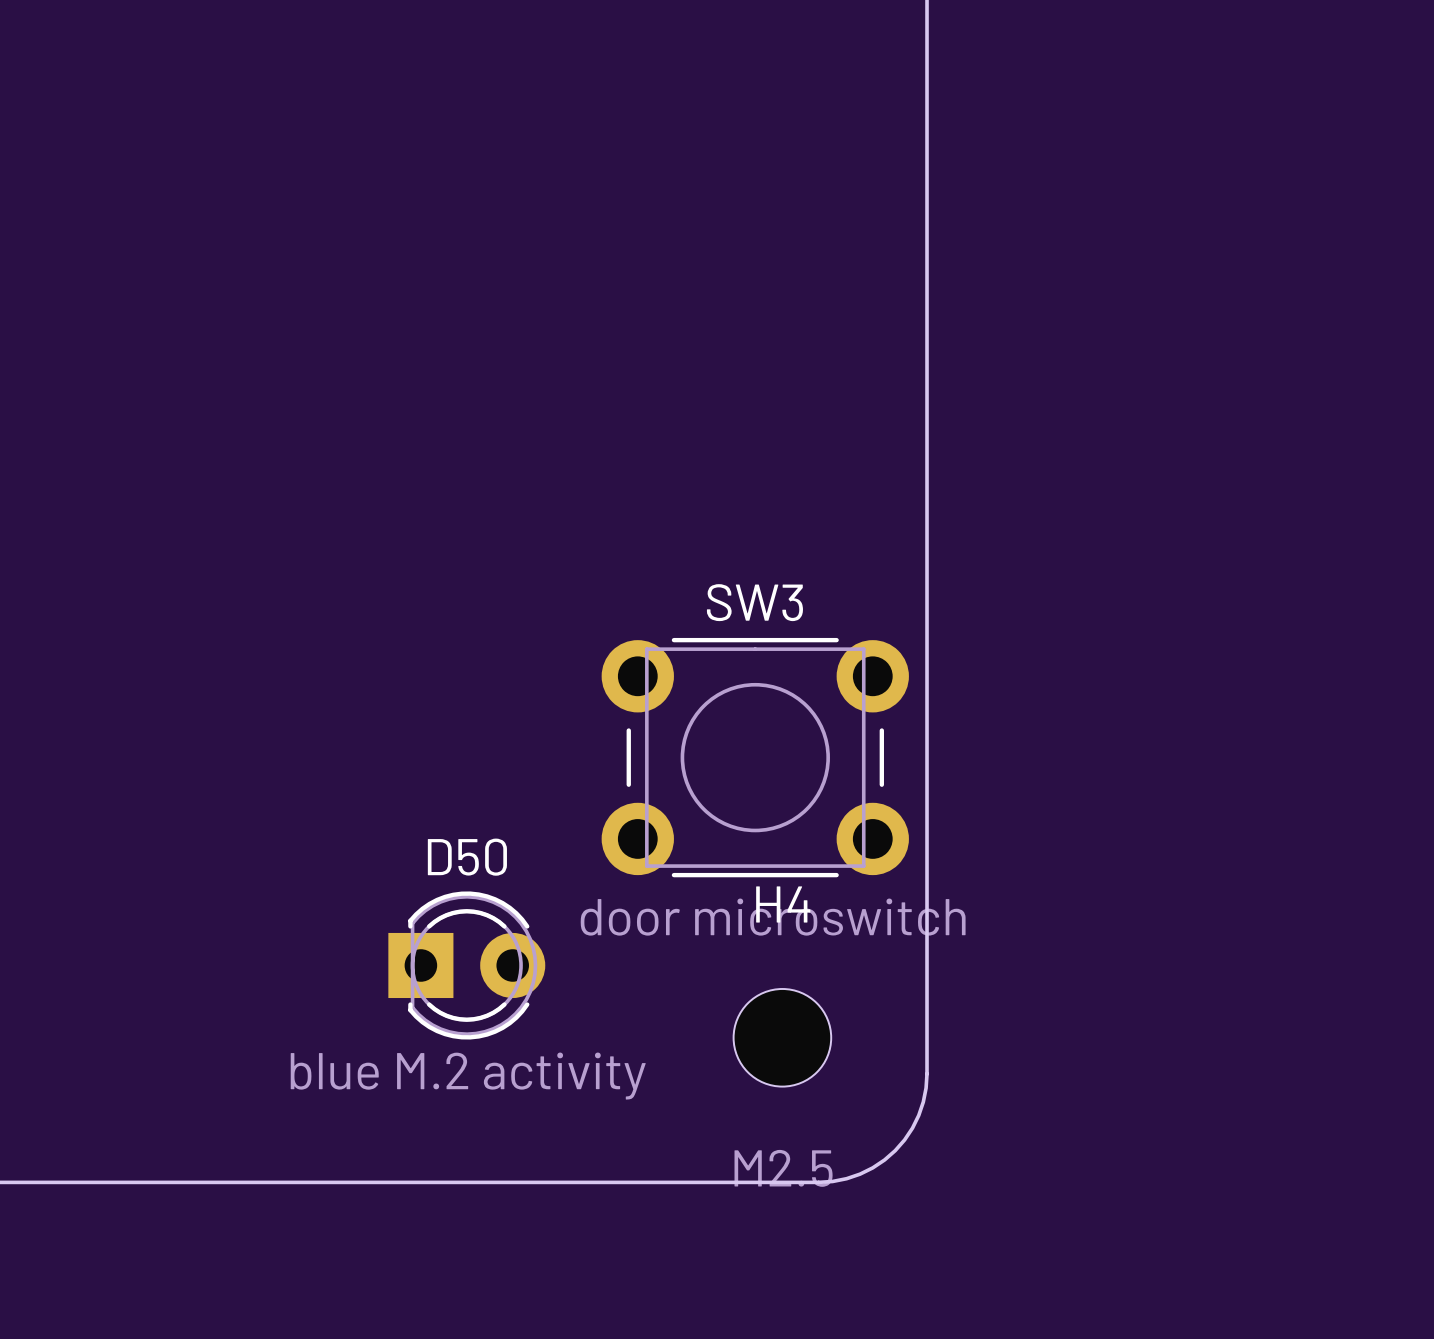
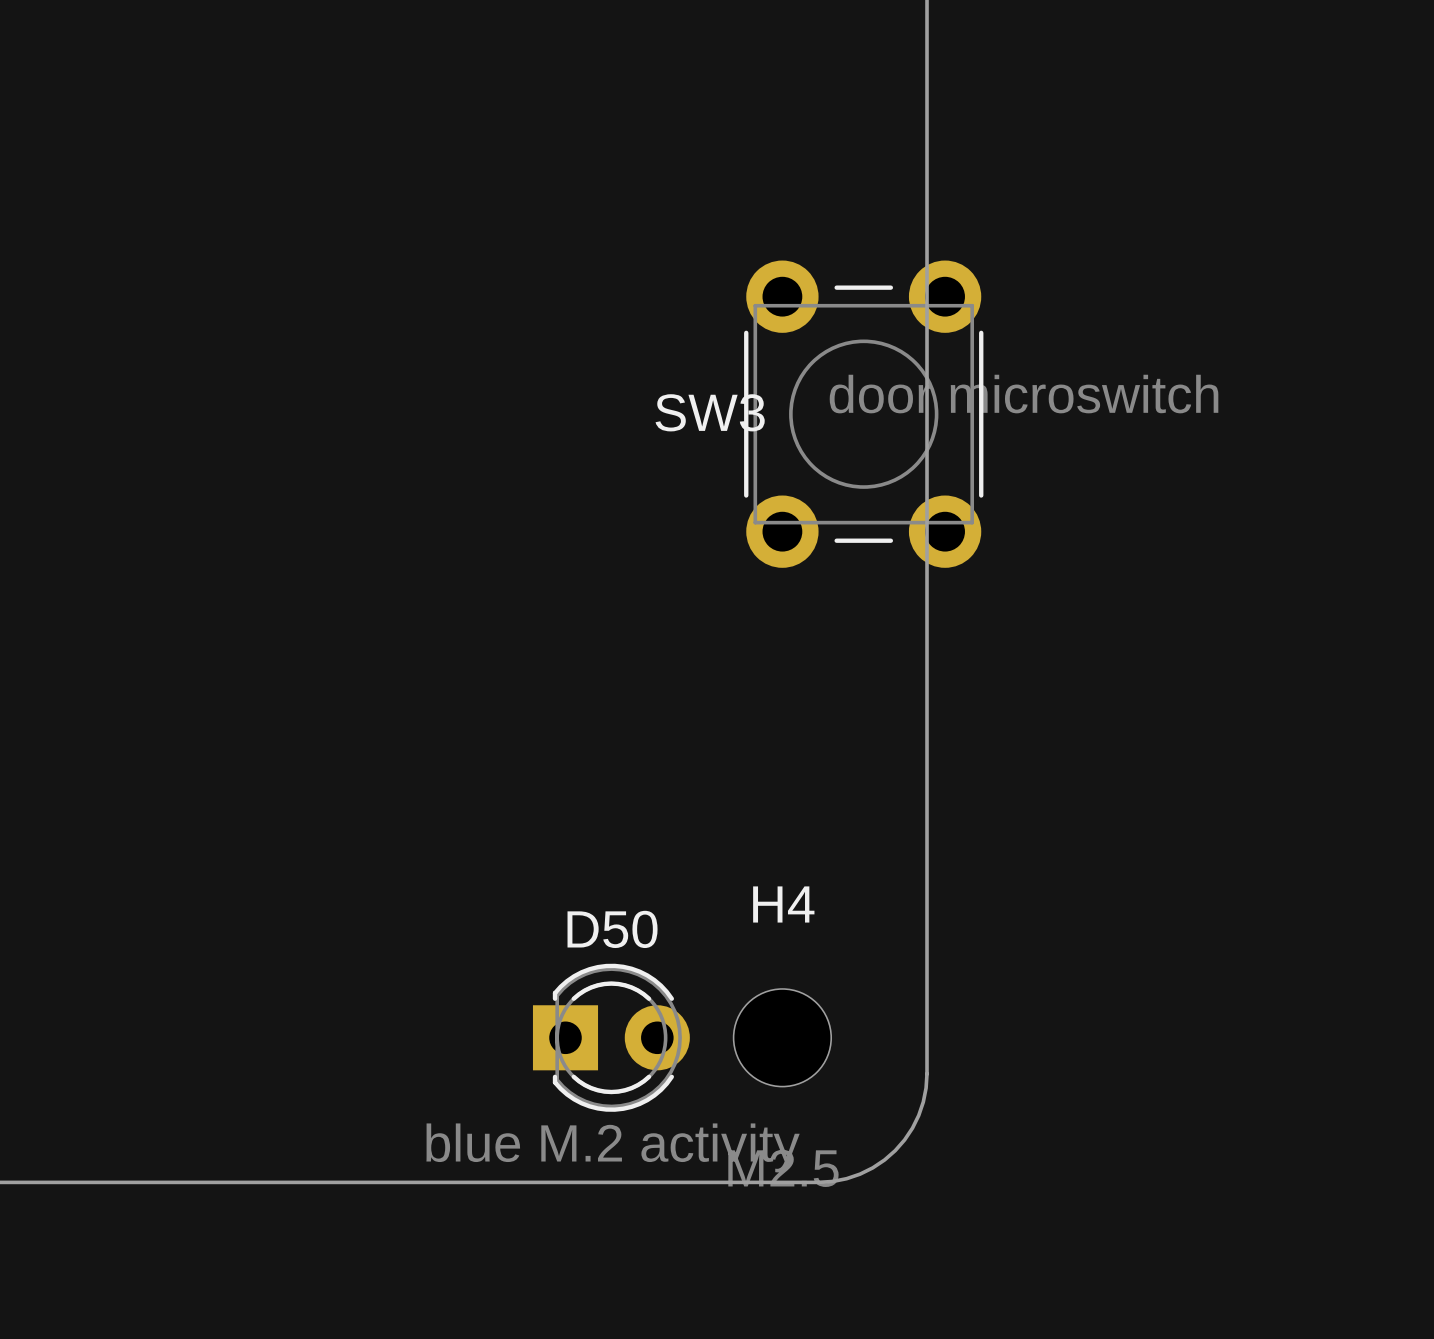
SW3 rotation: 0° (755, 757) -> 90° counterclockwise (863, 414)
SW3 position: (755, 757) -> (863, 414)
D50 position: (466, 965) -> (611, 1037)

